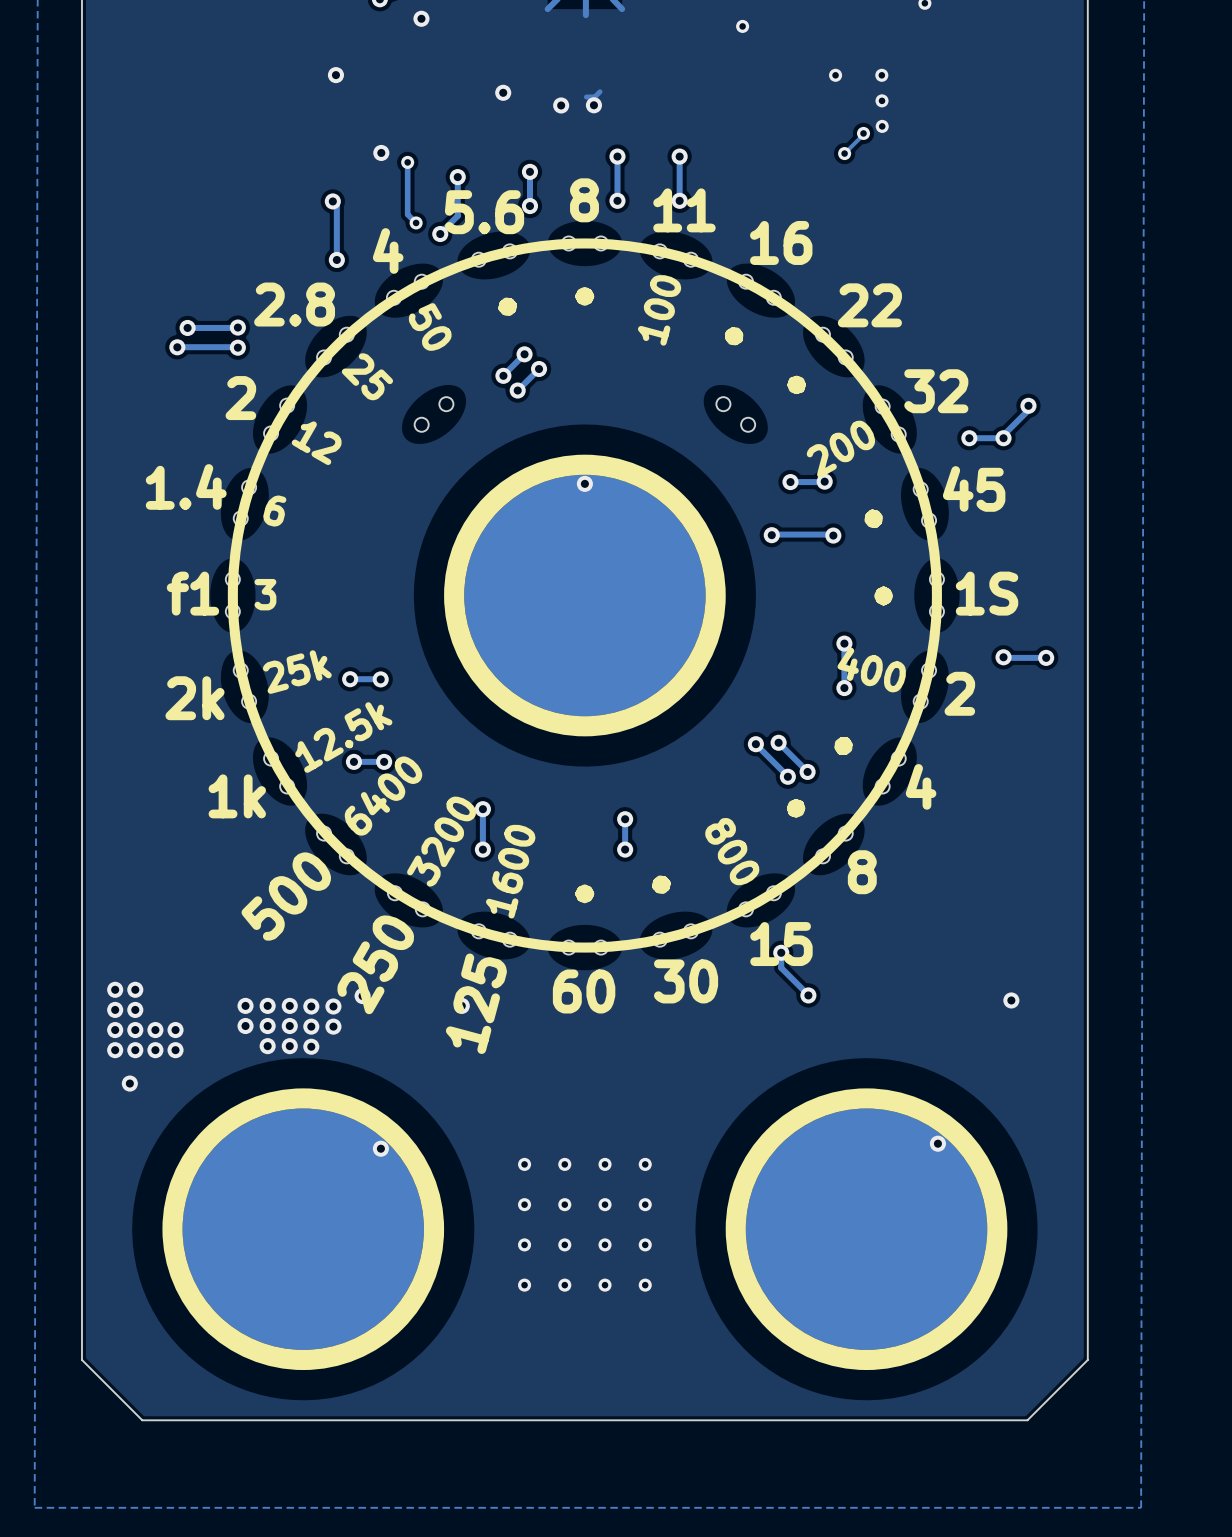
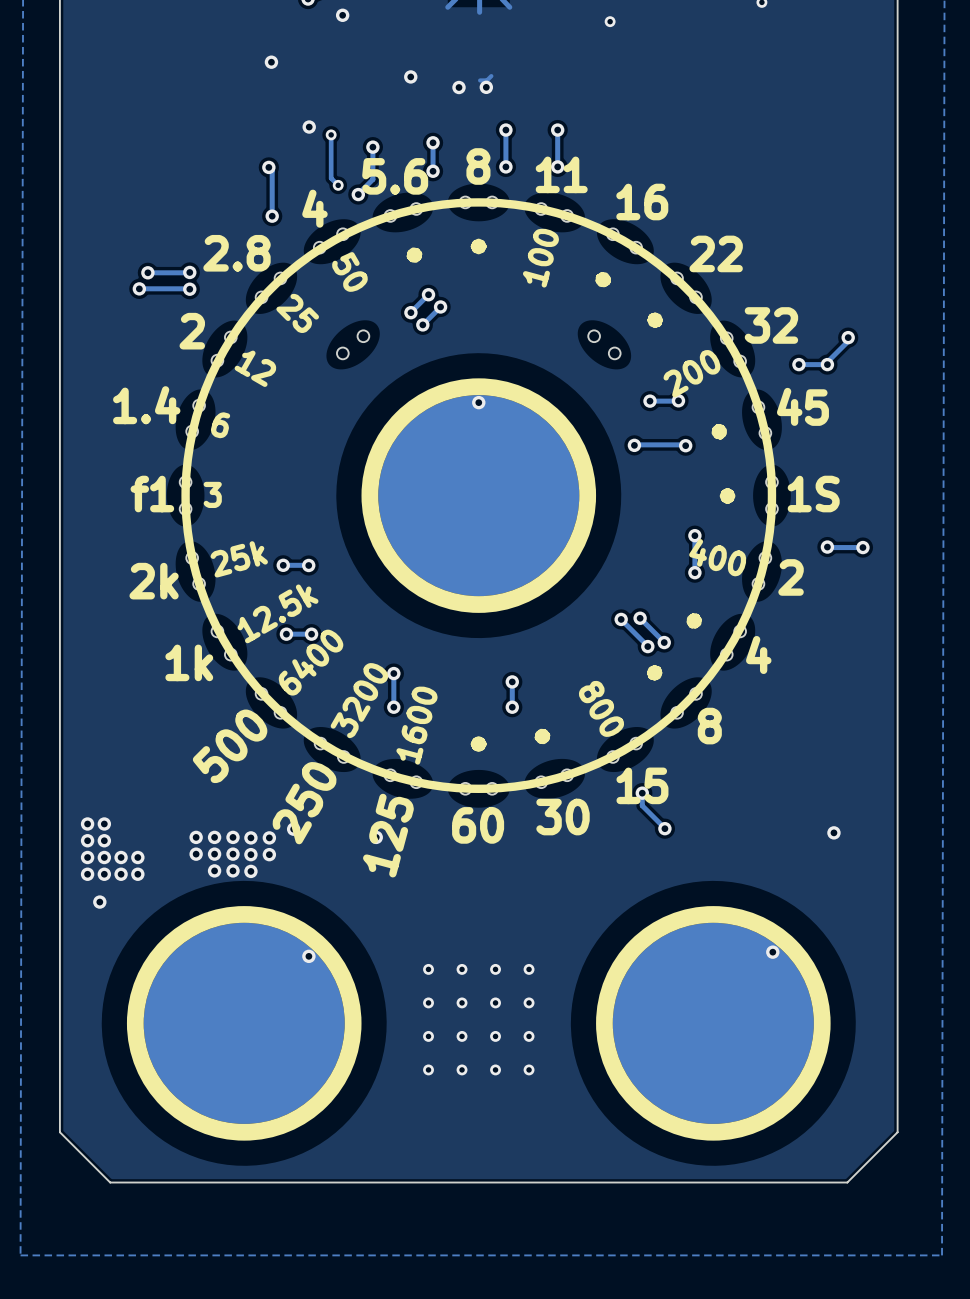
via: (835, 75) -> none
via: (881, 75) -> none
via: (882, 100) -> none
via: (882, 126) -> none
track: (863, 133) (844, 153) -> none
via: (863, 133) -> none
via: (844, 153) -> none

